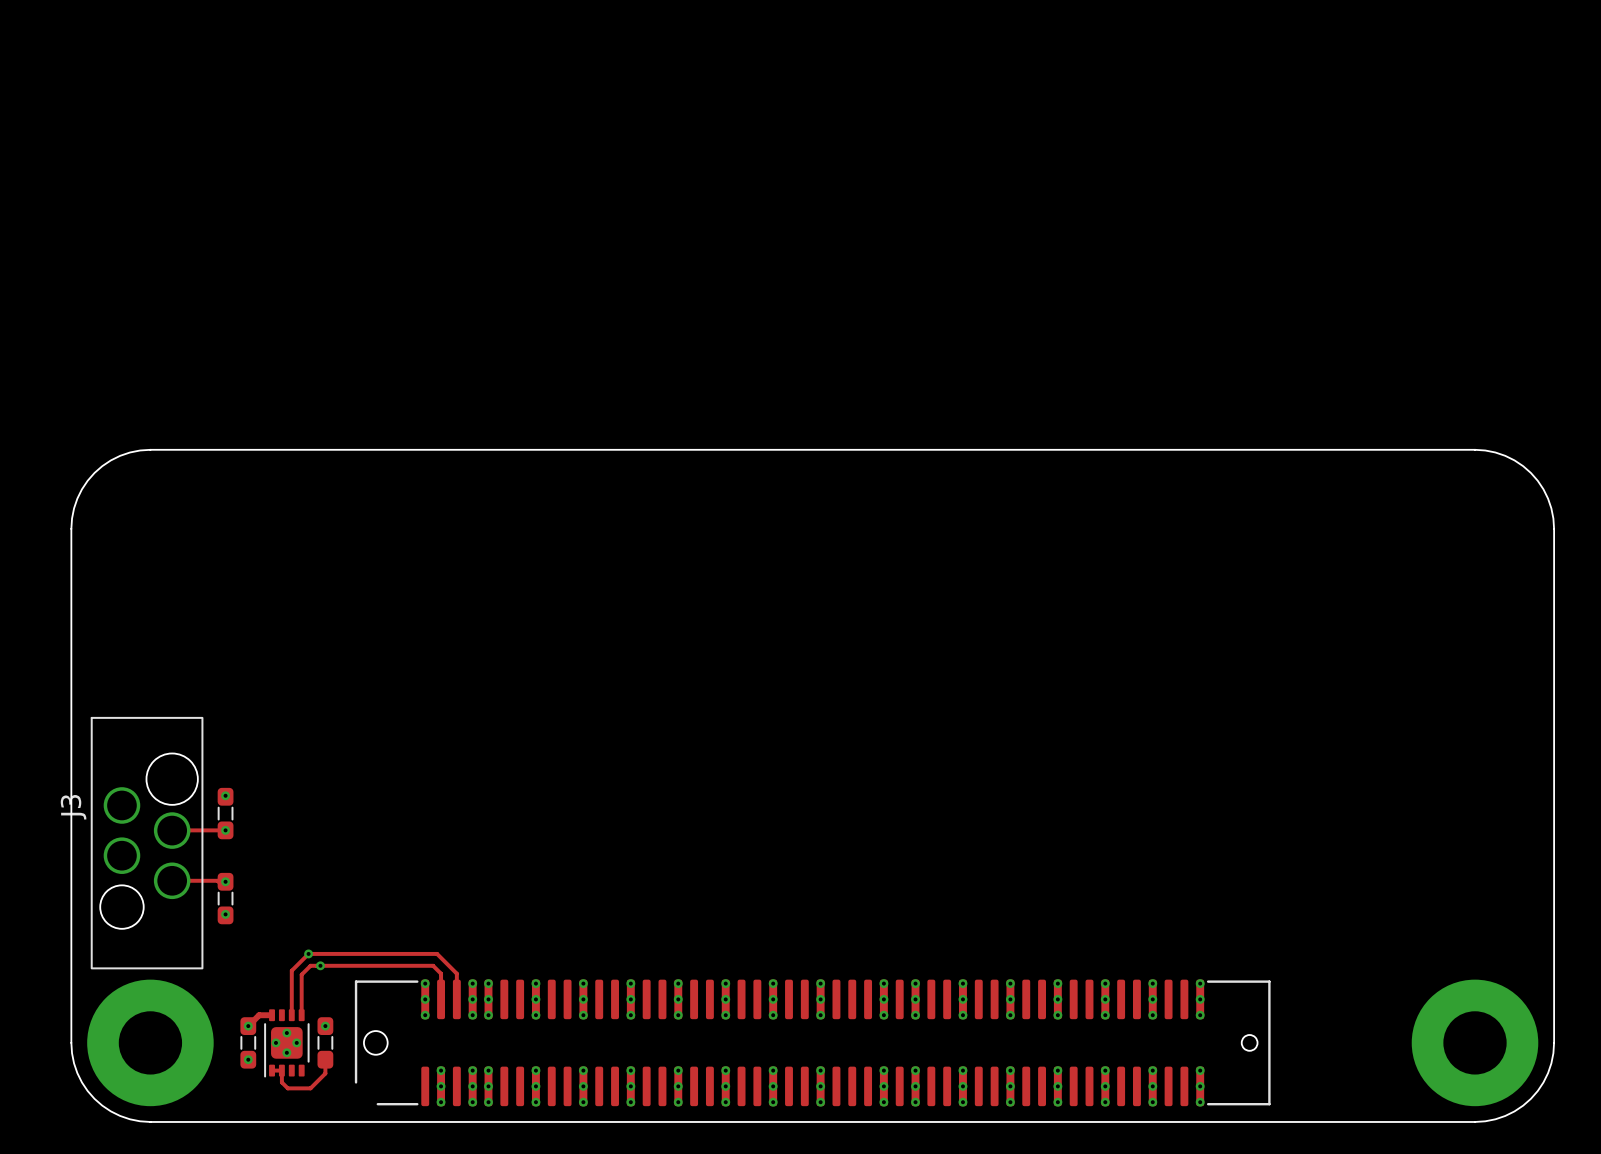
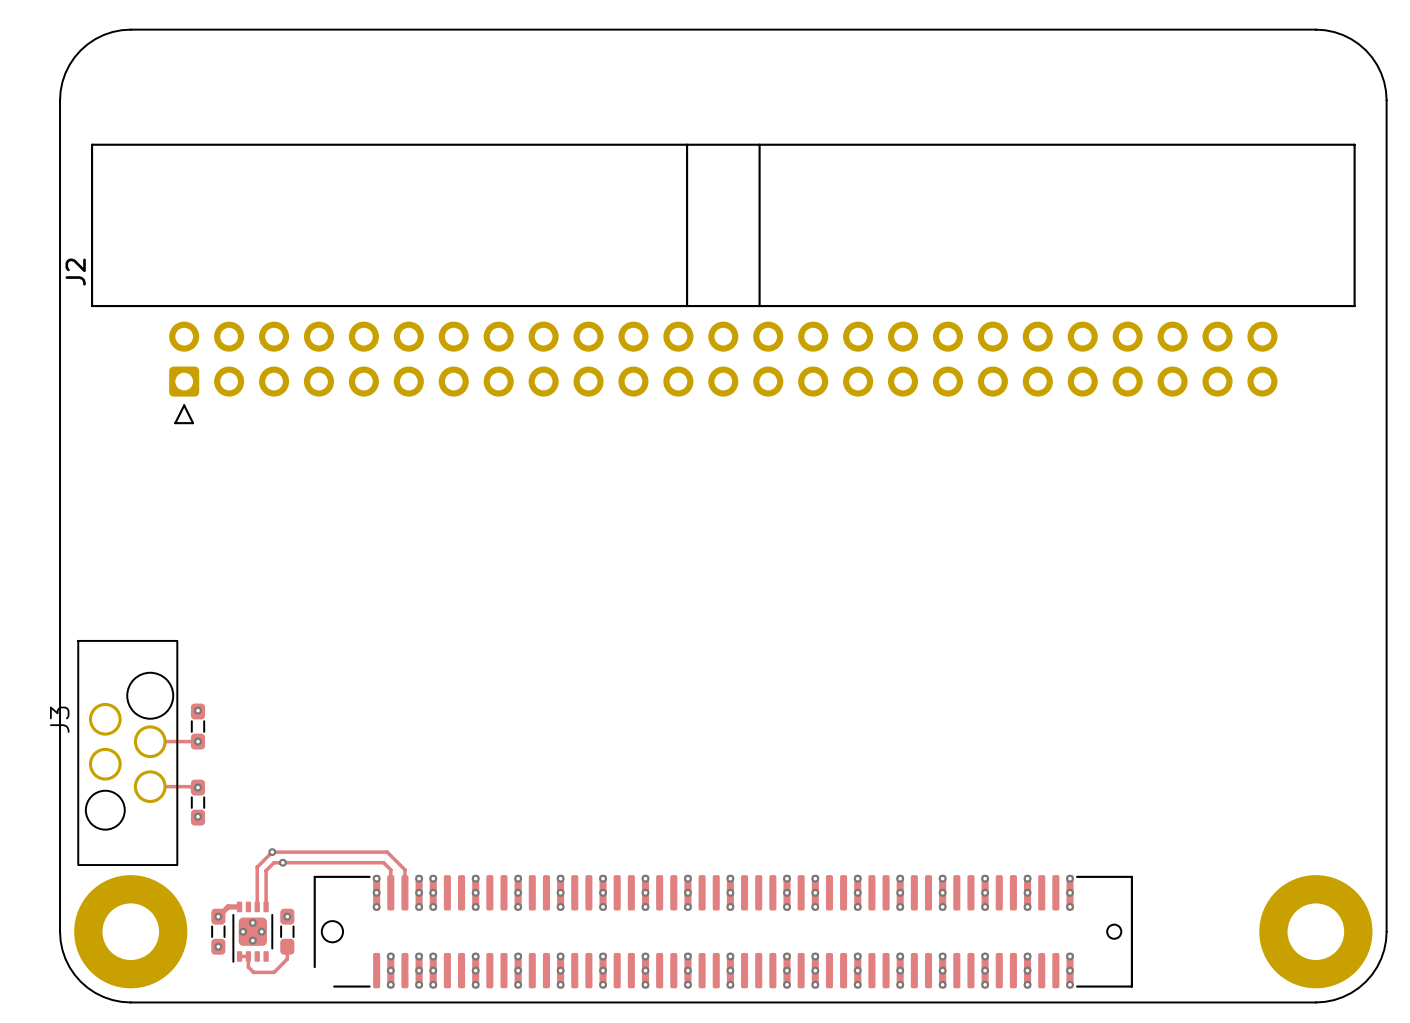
J2: none -> (723, 283)
board edge: (71, 528) (77, 498) (94, 472) (120, 455) (150, 449) (1475, 449) (1505, 455) (1530, 472) (1548, 498) (1554, 528) -> (60, 471) (60, 91) (69, 65) (80, 50) (103, 35) (130, 29) (1315, 29) (1342, 35) (1358, 44) (1372, 57) (1381, 73) (1386, 91) (1386, 471)

